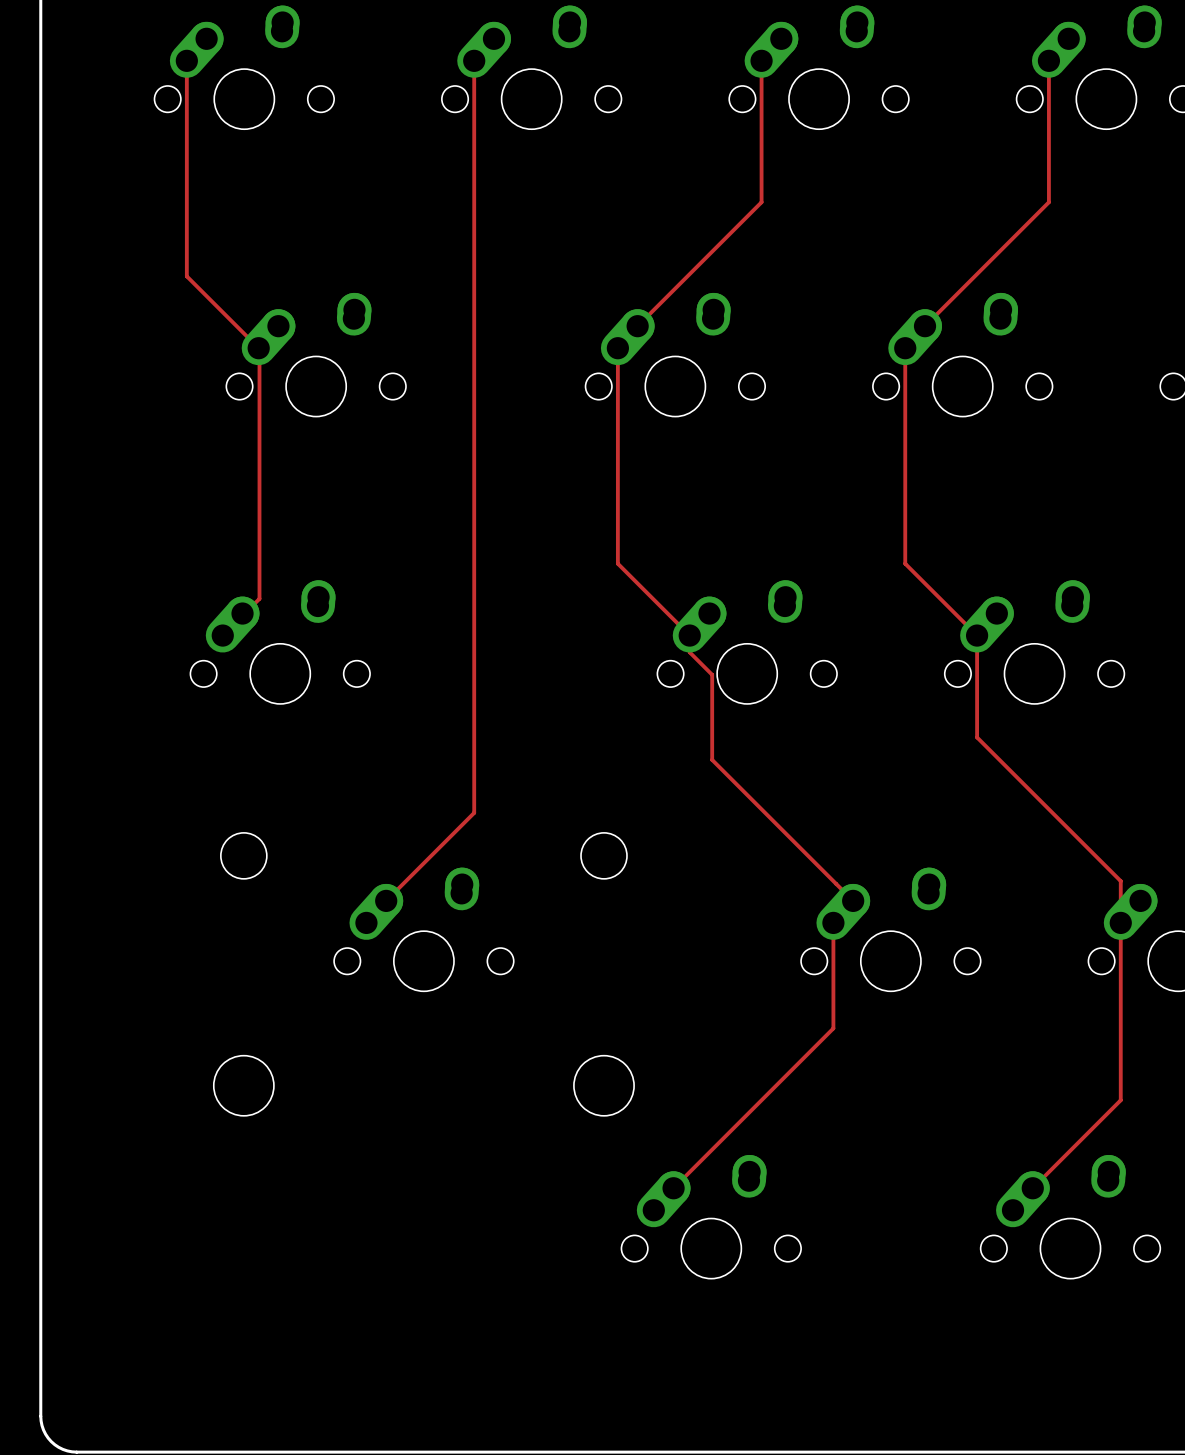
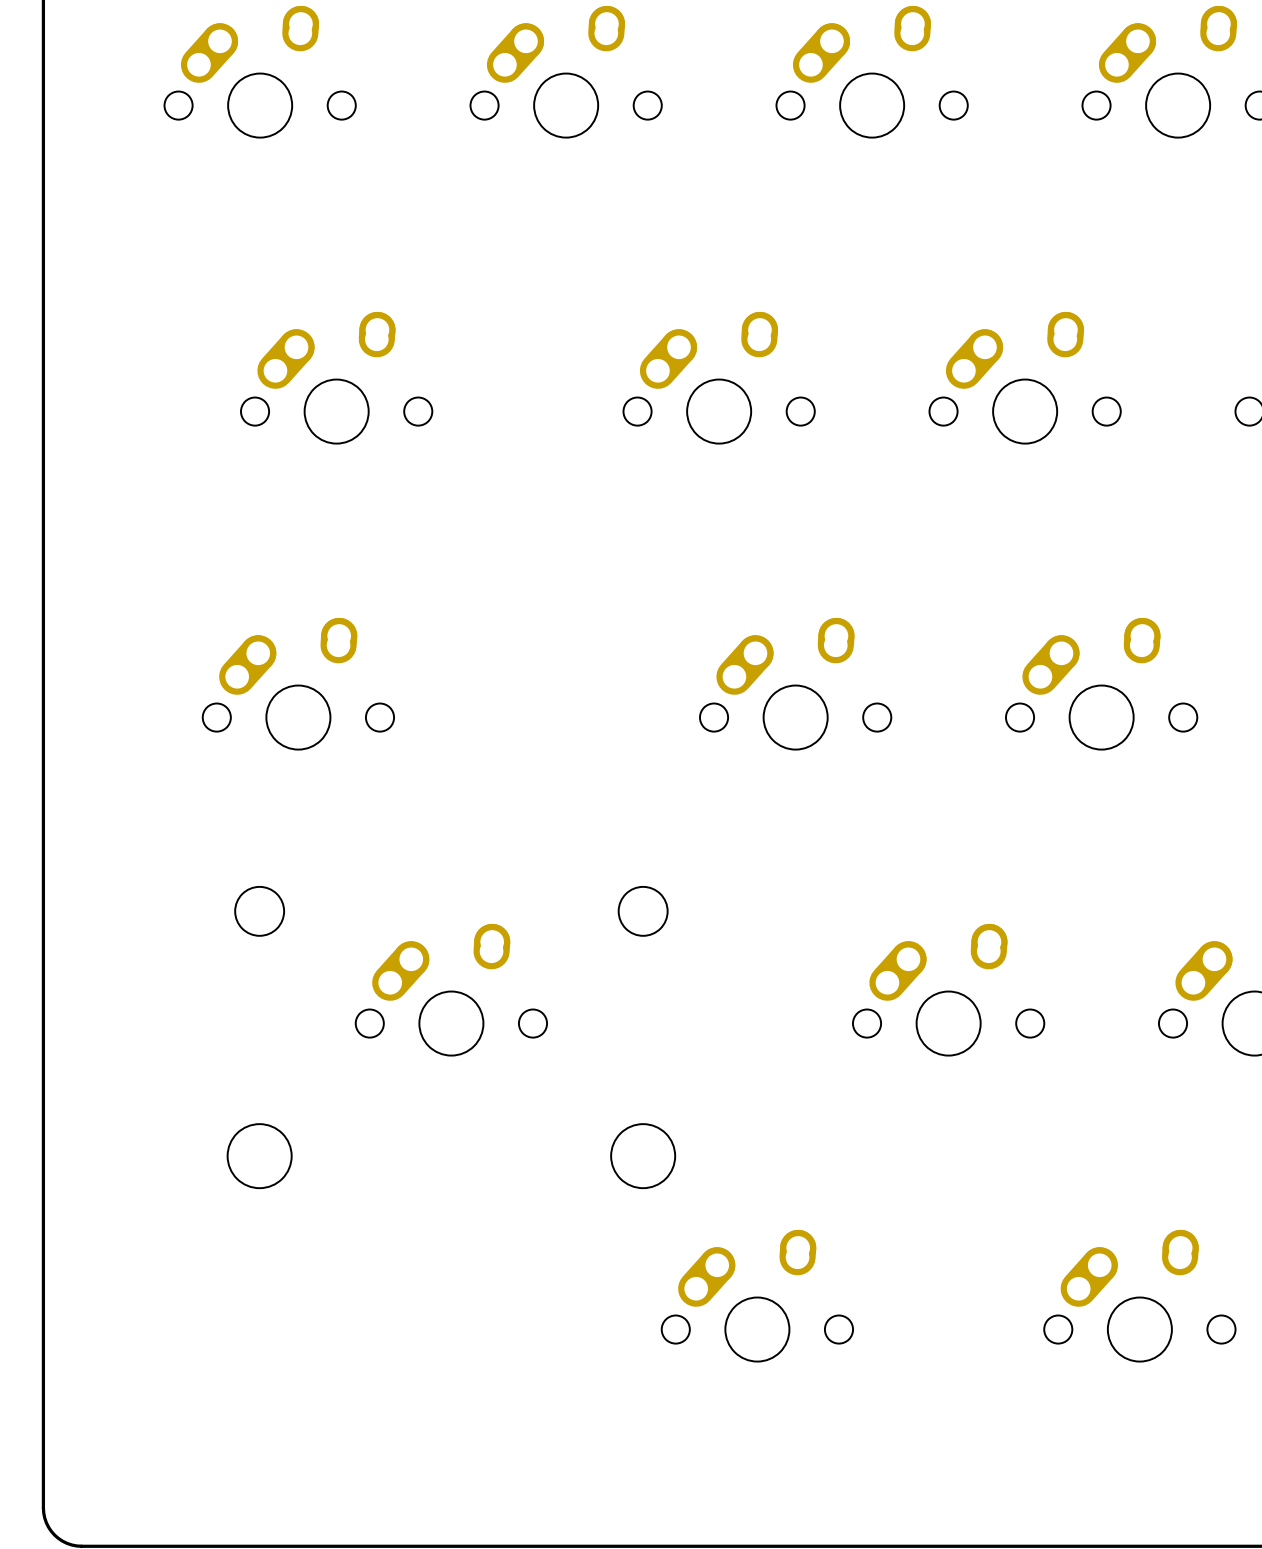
track: (186, 60) (186, 276) (259, 349) (259, 598) (222, 635) -> none
track: (474, 60) (474, 812) (366, 920) (366, 922) -> none
track: (761, 60) (761, 202) (637, 326) -> none
track: (1048, 60) (1048, 202) (905, 345) (905, 563) (977, 635) (977, 737) (1120, 881) (1120, 1100) (1013, 1208) (1013, 1210) -> none
track: (617, 348) (617, 563) (689, 635) (689, 652) (712, 674) (712, 759) (853, 900) -> none
track: (833, 922) (833, 1028) (673, 1188) -> none

